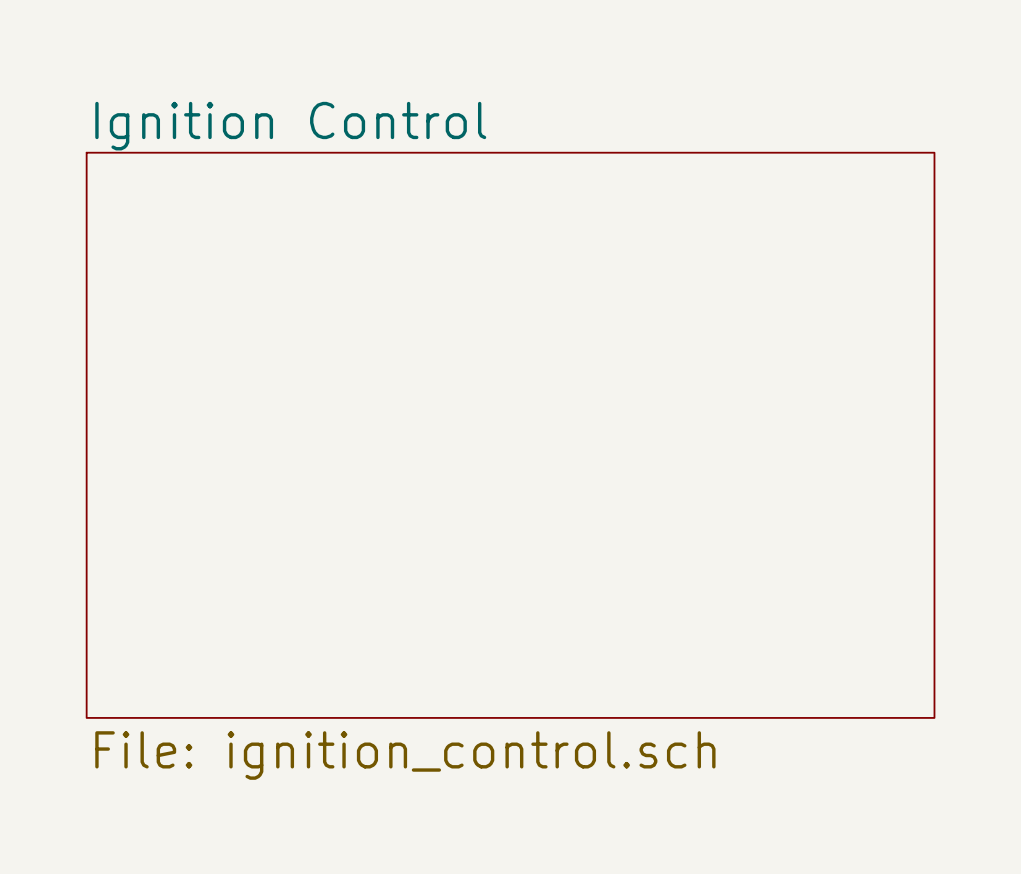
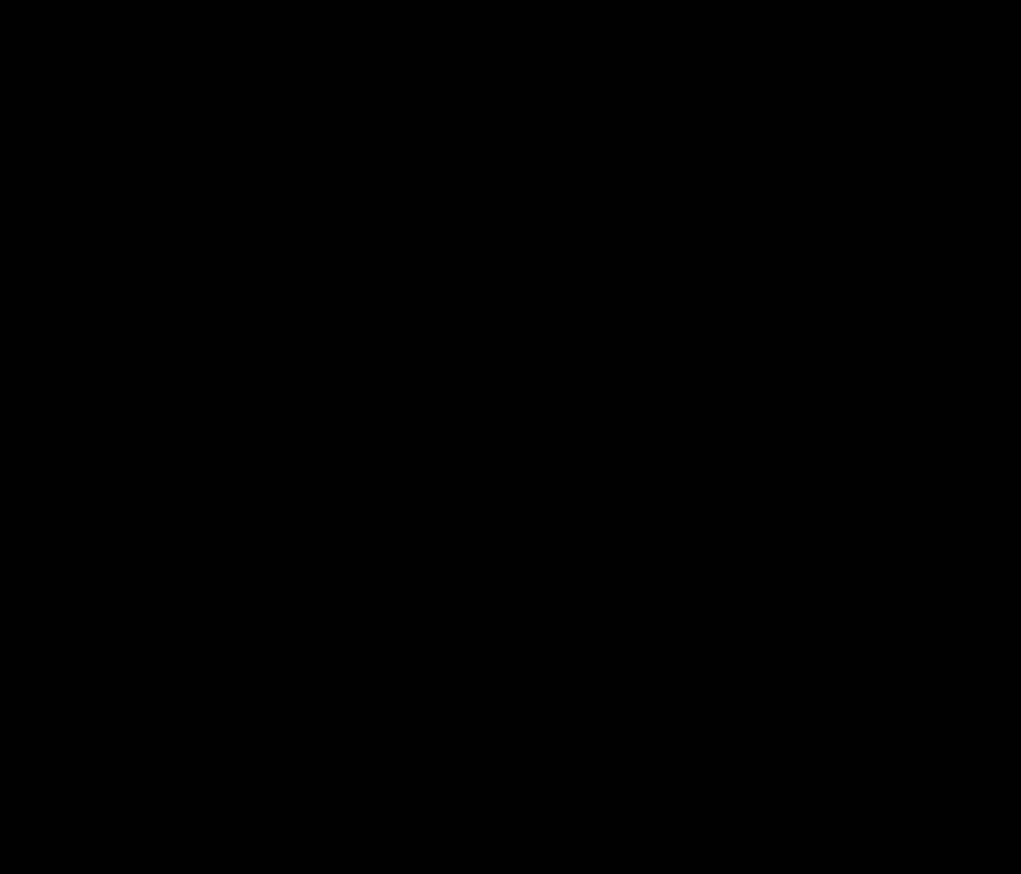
sheet Ignition Control: File: ignition_control.sch (510, 435) -> none

